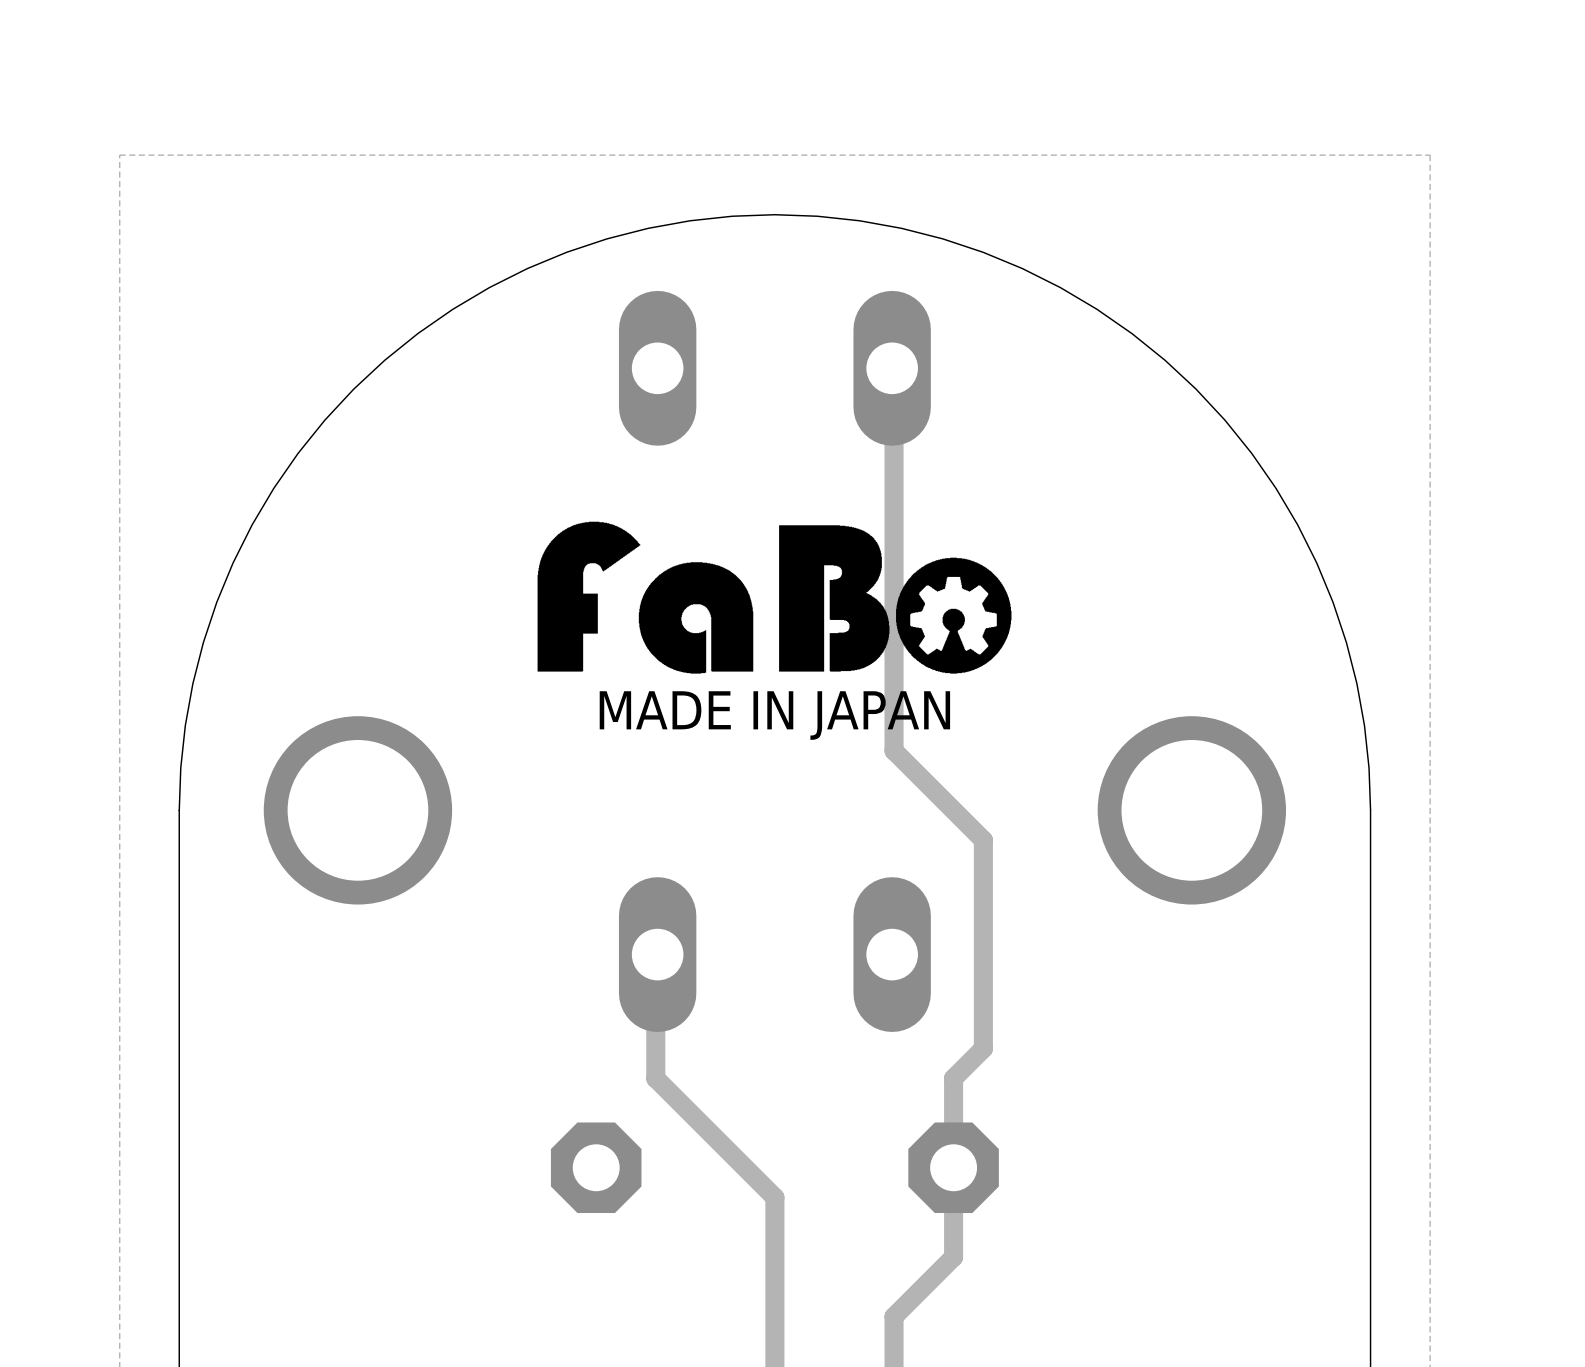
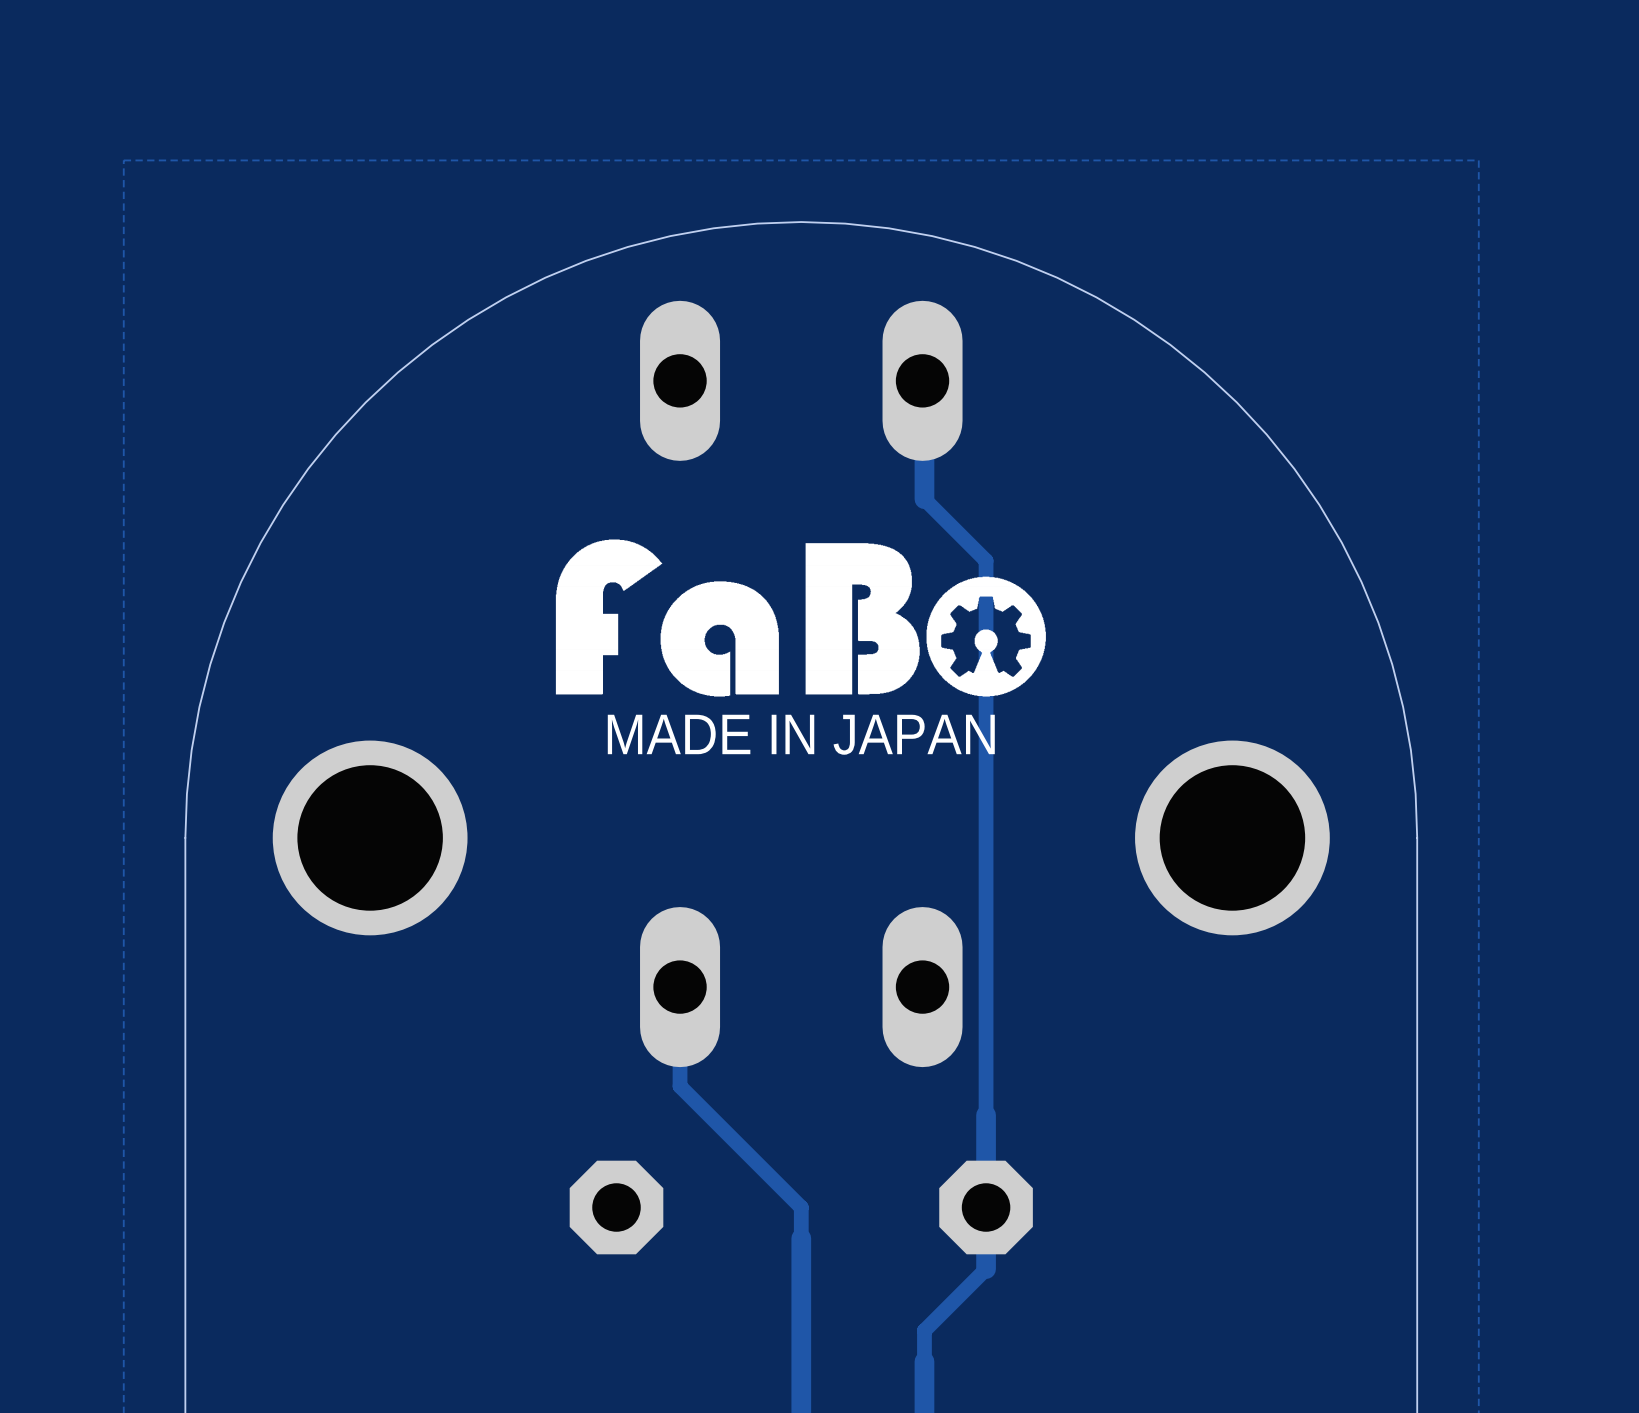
track: (894, 482) (894, 750) (983, 840) (983, 1048) (953, 1078) -> (924, 499) (986, 560) (986, 1115)
track: (657, 954) (655, 954) (655, 1078) (774, 1197) -> (680, 987) (680, 1086) (801, 1207) (801, 1238)
track: (953, 1227) (953, 1257) (894, 1316) -> (986, 1269) (924, 1330) (924, 1361)

